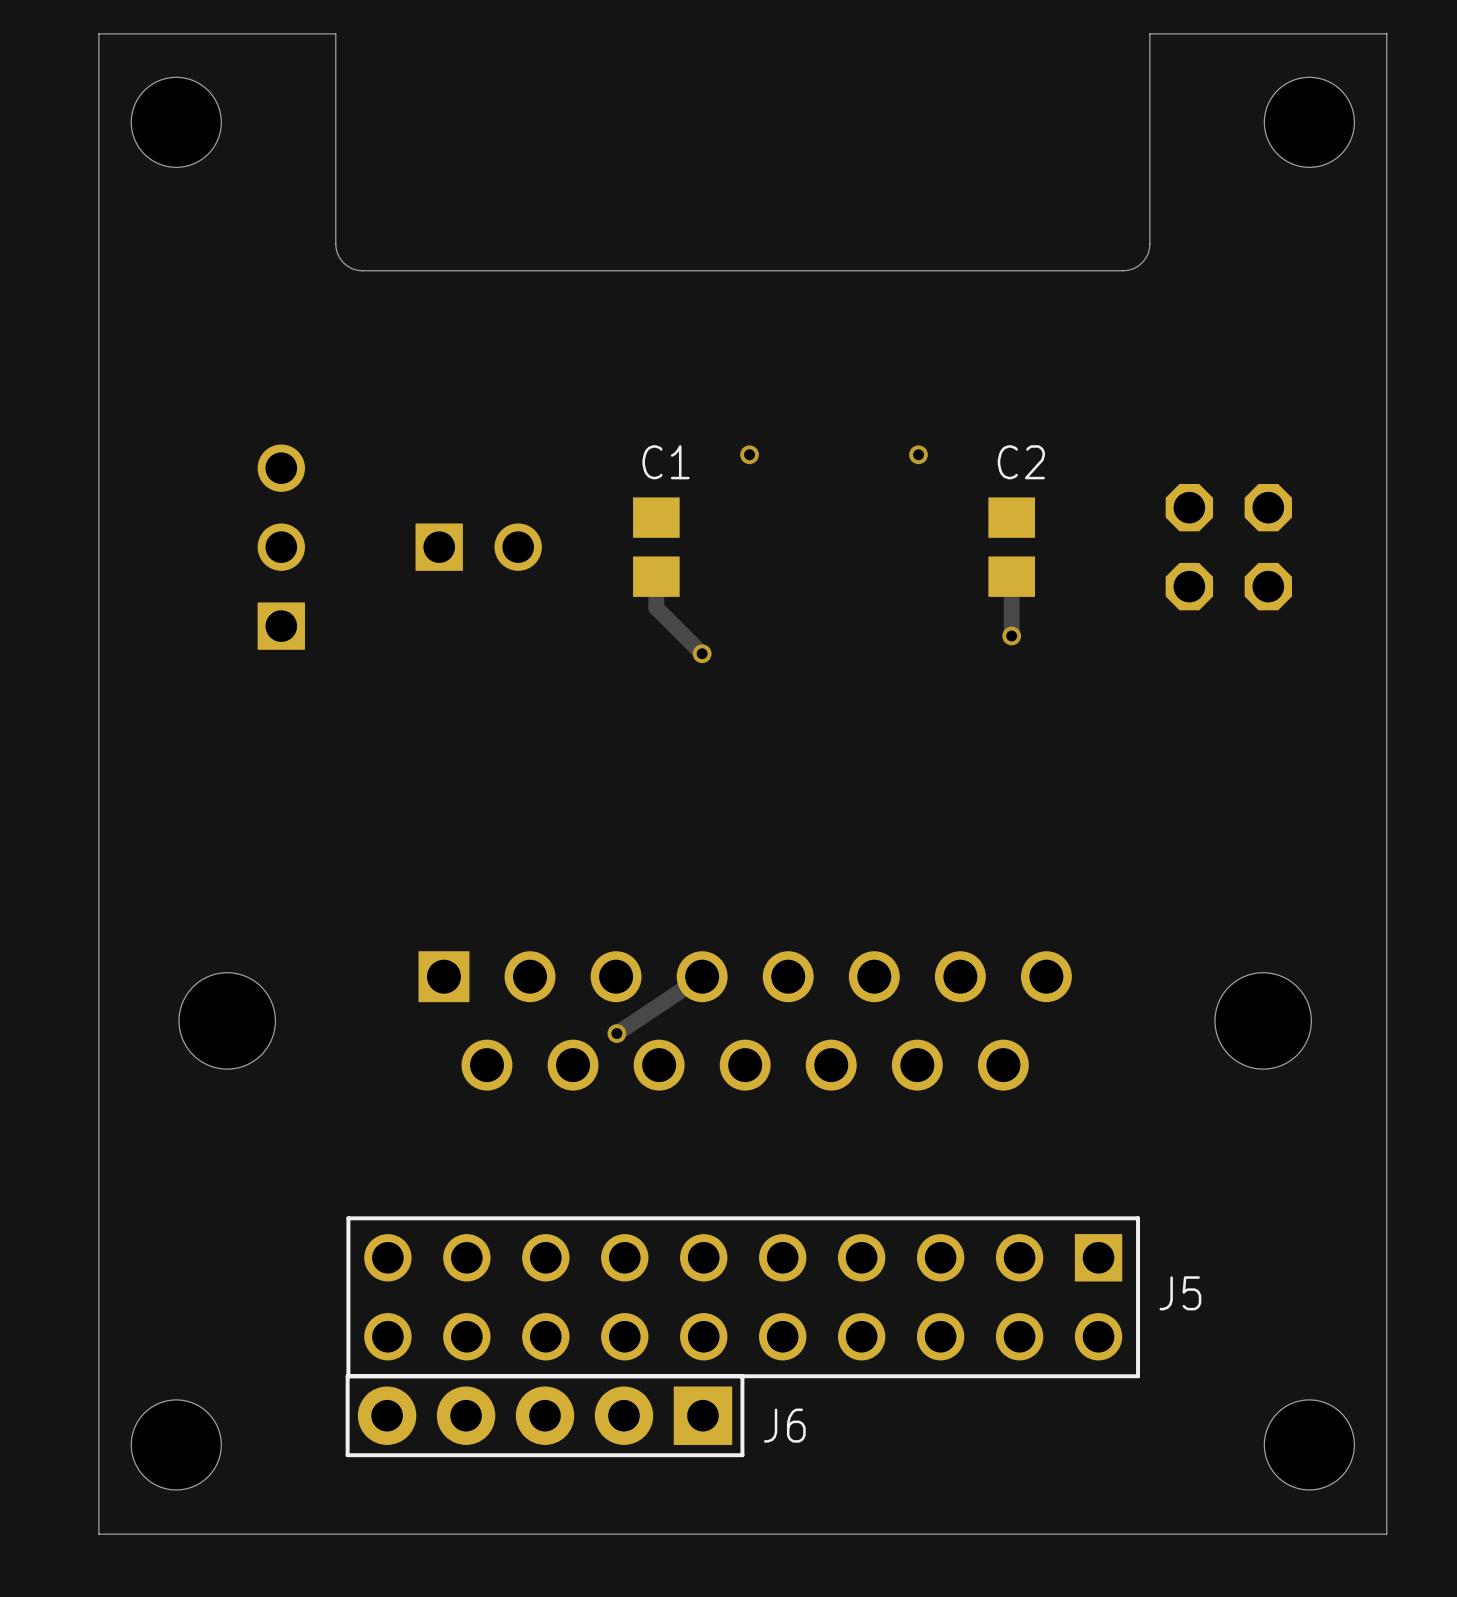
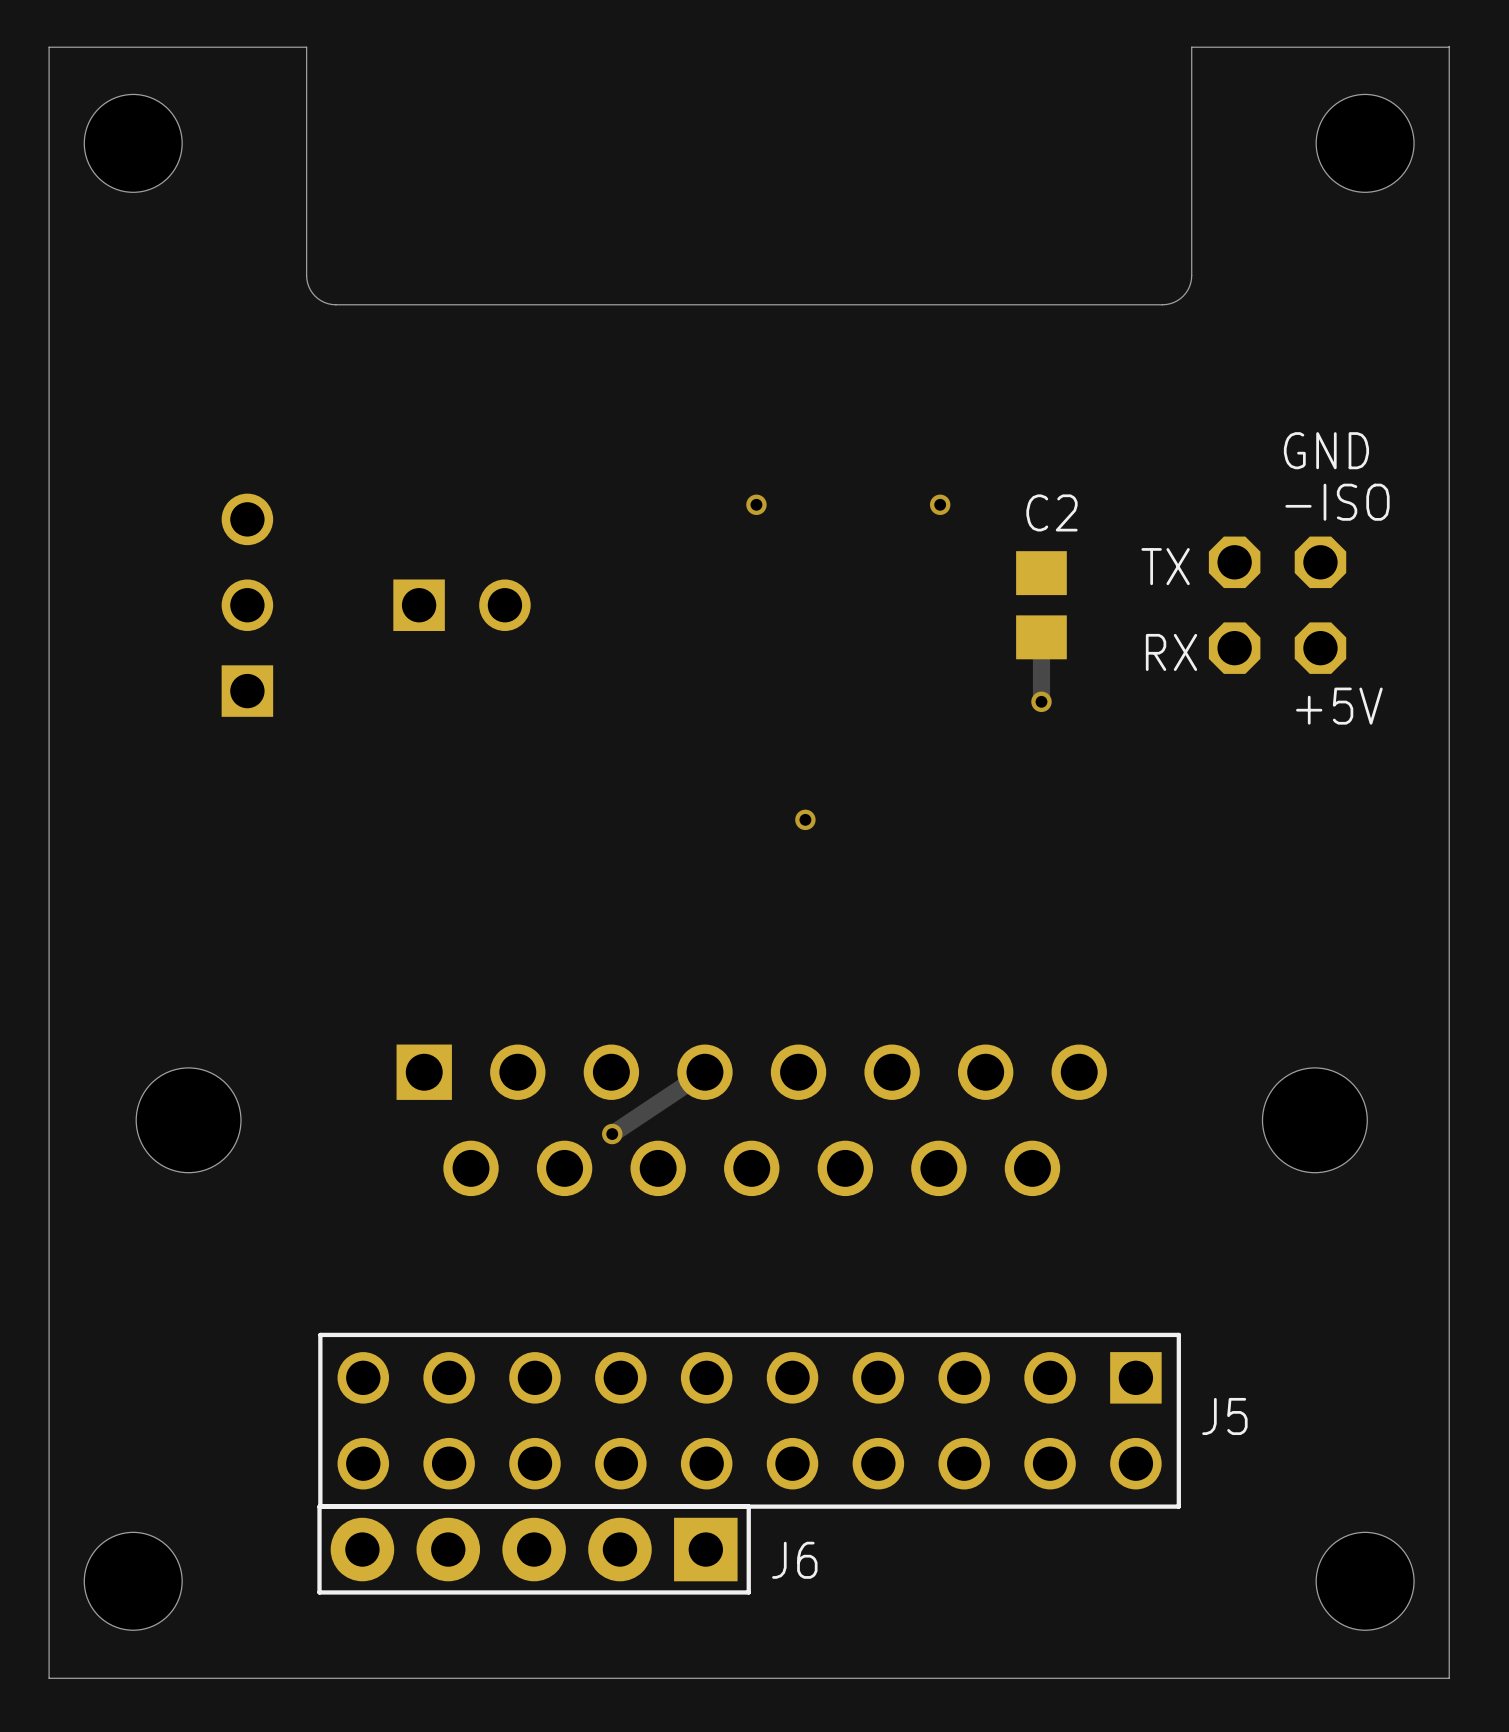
text: none -> GND (1326, 450)
text: none -> -ISO (1337, 502)
text: none -> TX (1165, 566)
C1: (656, 547) -> none
track: (656, 576) (656, 607) (702, 653) -> none
text: none -> RX (1171, 652)
text: none -> +5V (1339, 706)
via position: (702, 653) -> (805, 819)

